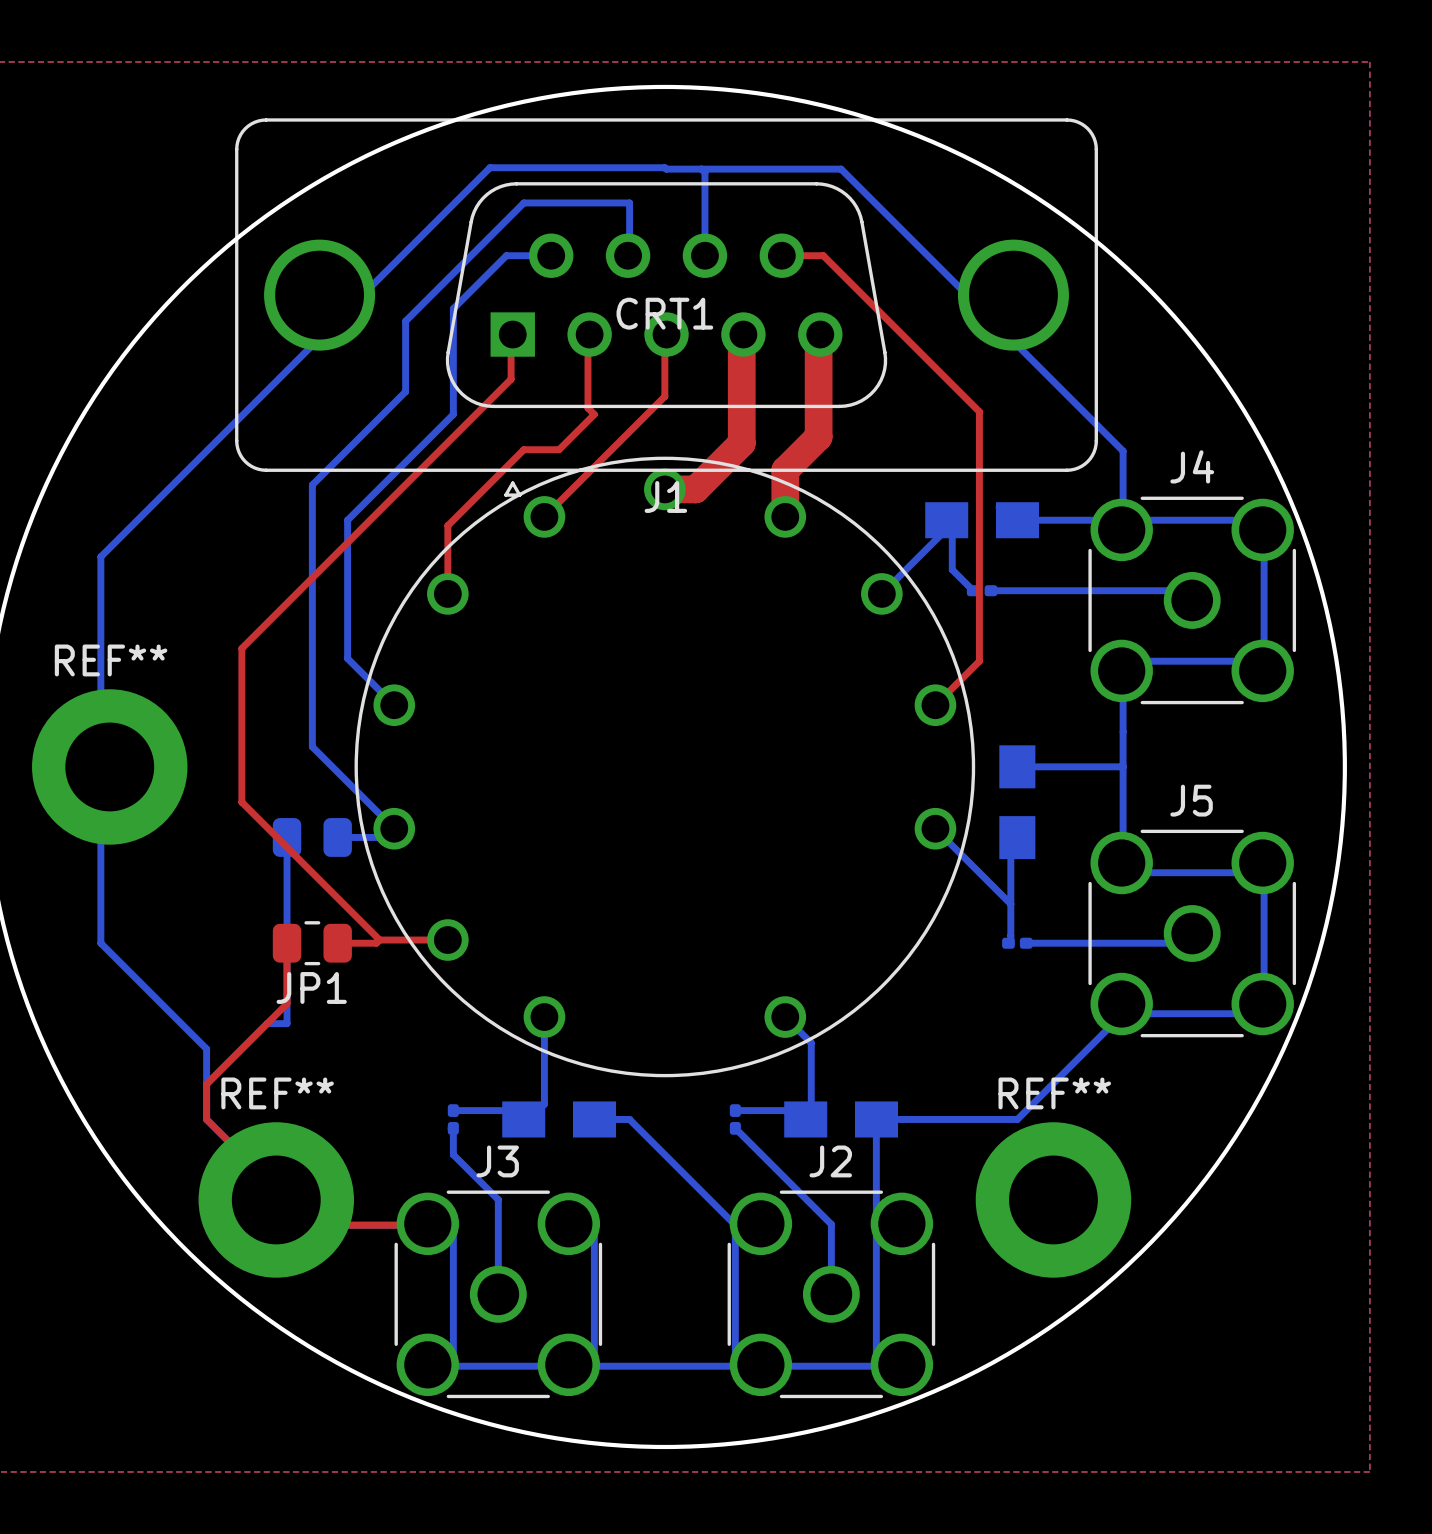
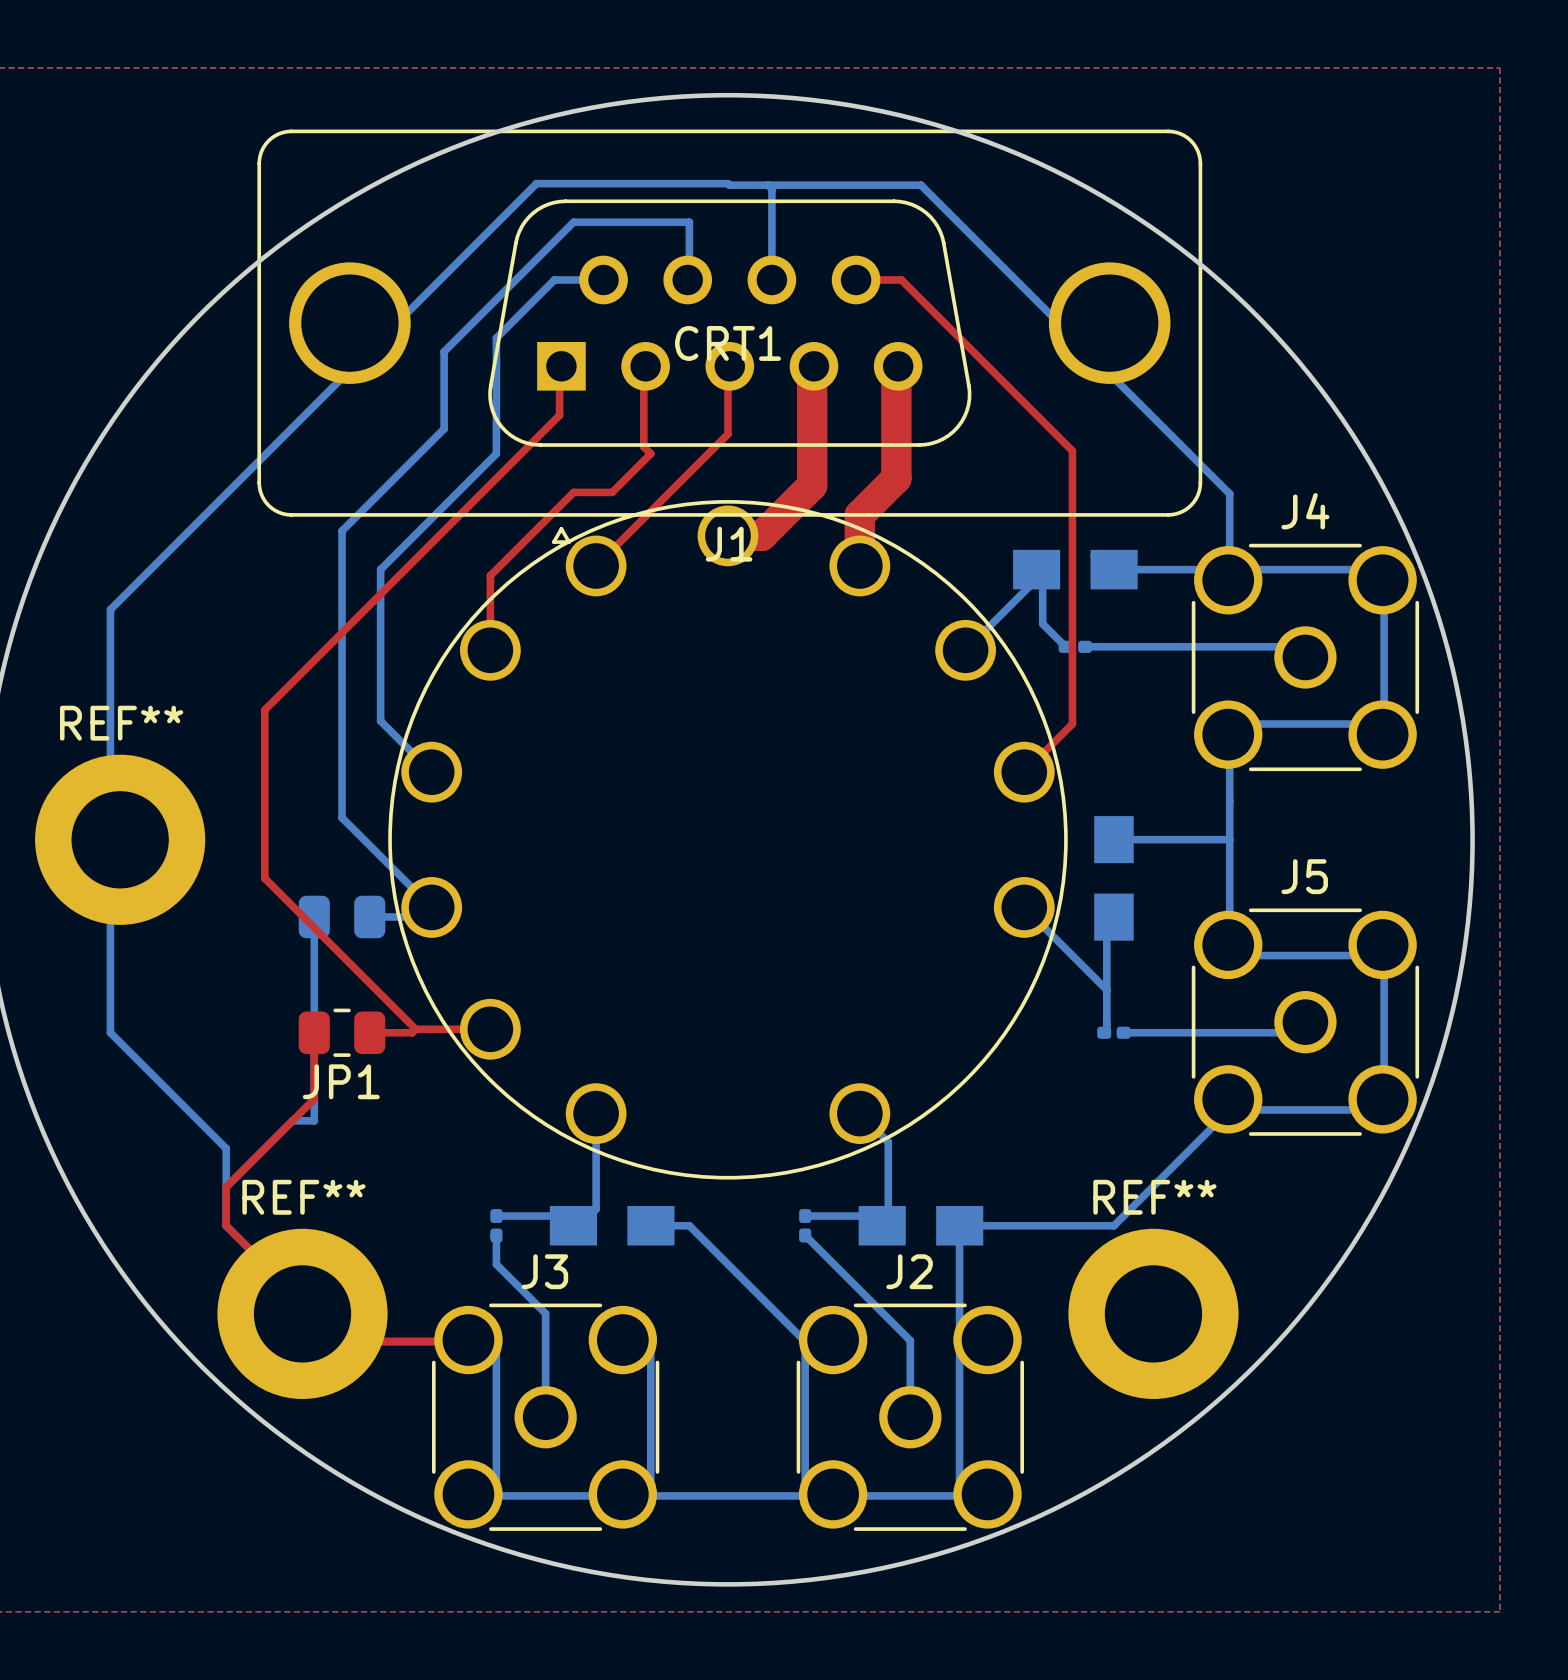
CRT1 footprint: [354, 456, 976, 1078] -> [388, 500, 1068, 1180]

